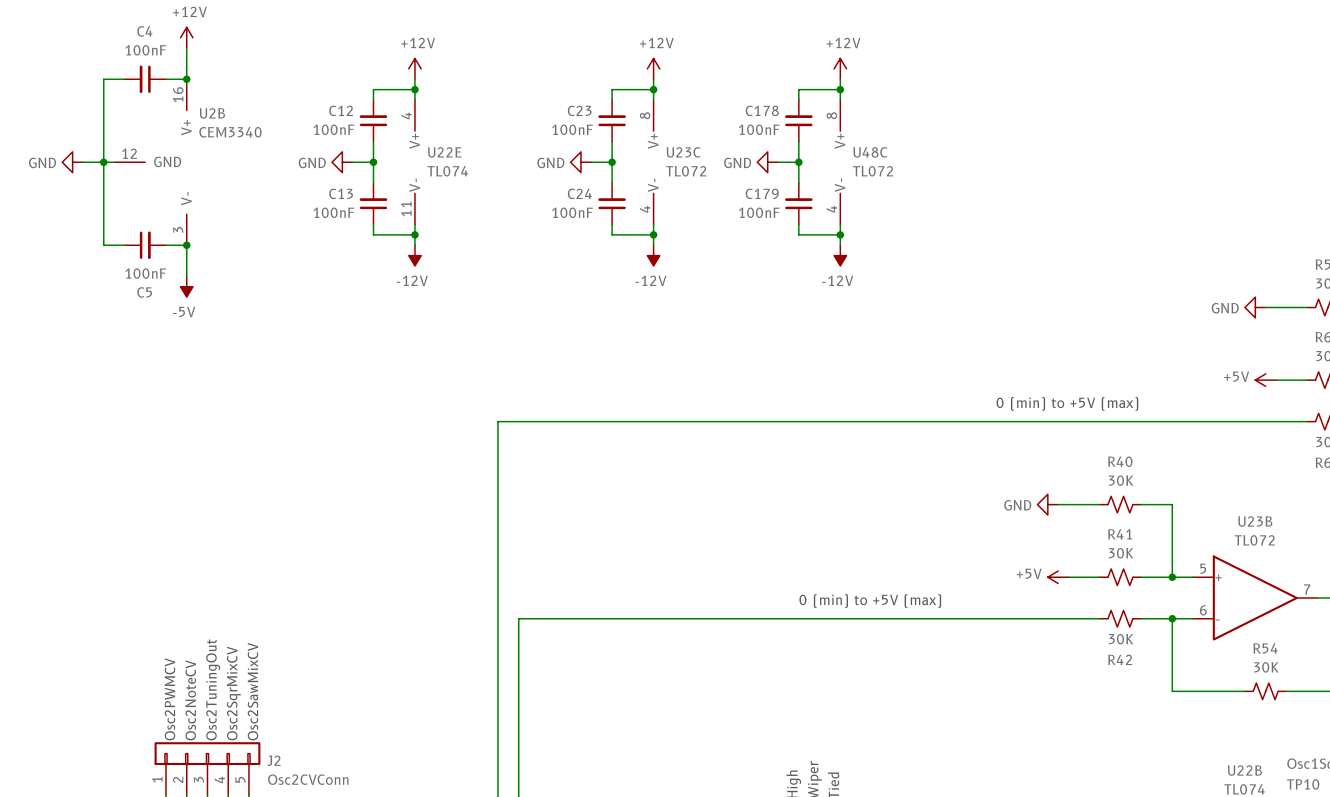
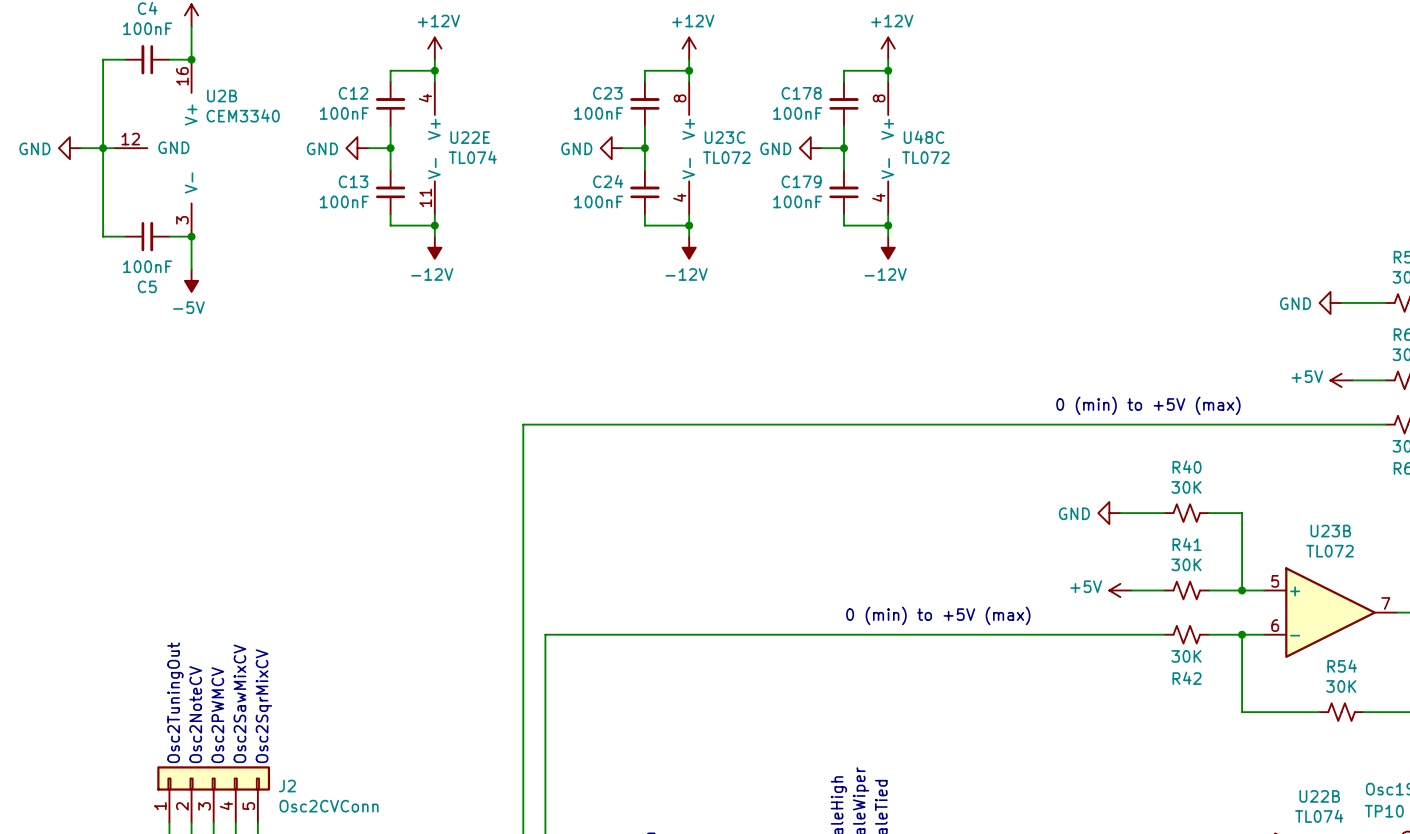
text: Osc2TuningOut (213, 689) -> Osc2PWMCV (217, 715)
text: Osc2SawMixCV (252, 691) -> Osc2SqrMixCV (263, 706)
text: Osc2SqrMixCV (233, 693) -> Osc2SawMixCV (239, 703)
text: Osc2PWMCV (169, 699) -> Osc2TuningOut (175, 702)

